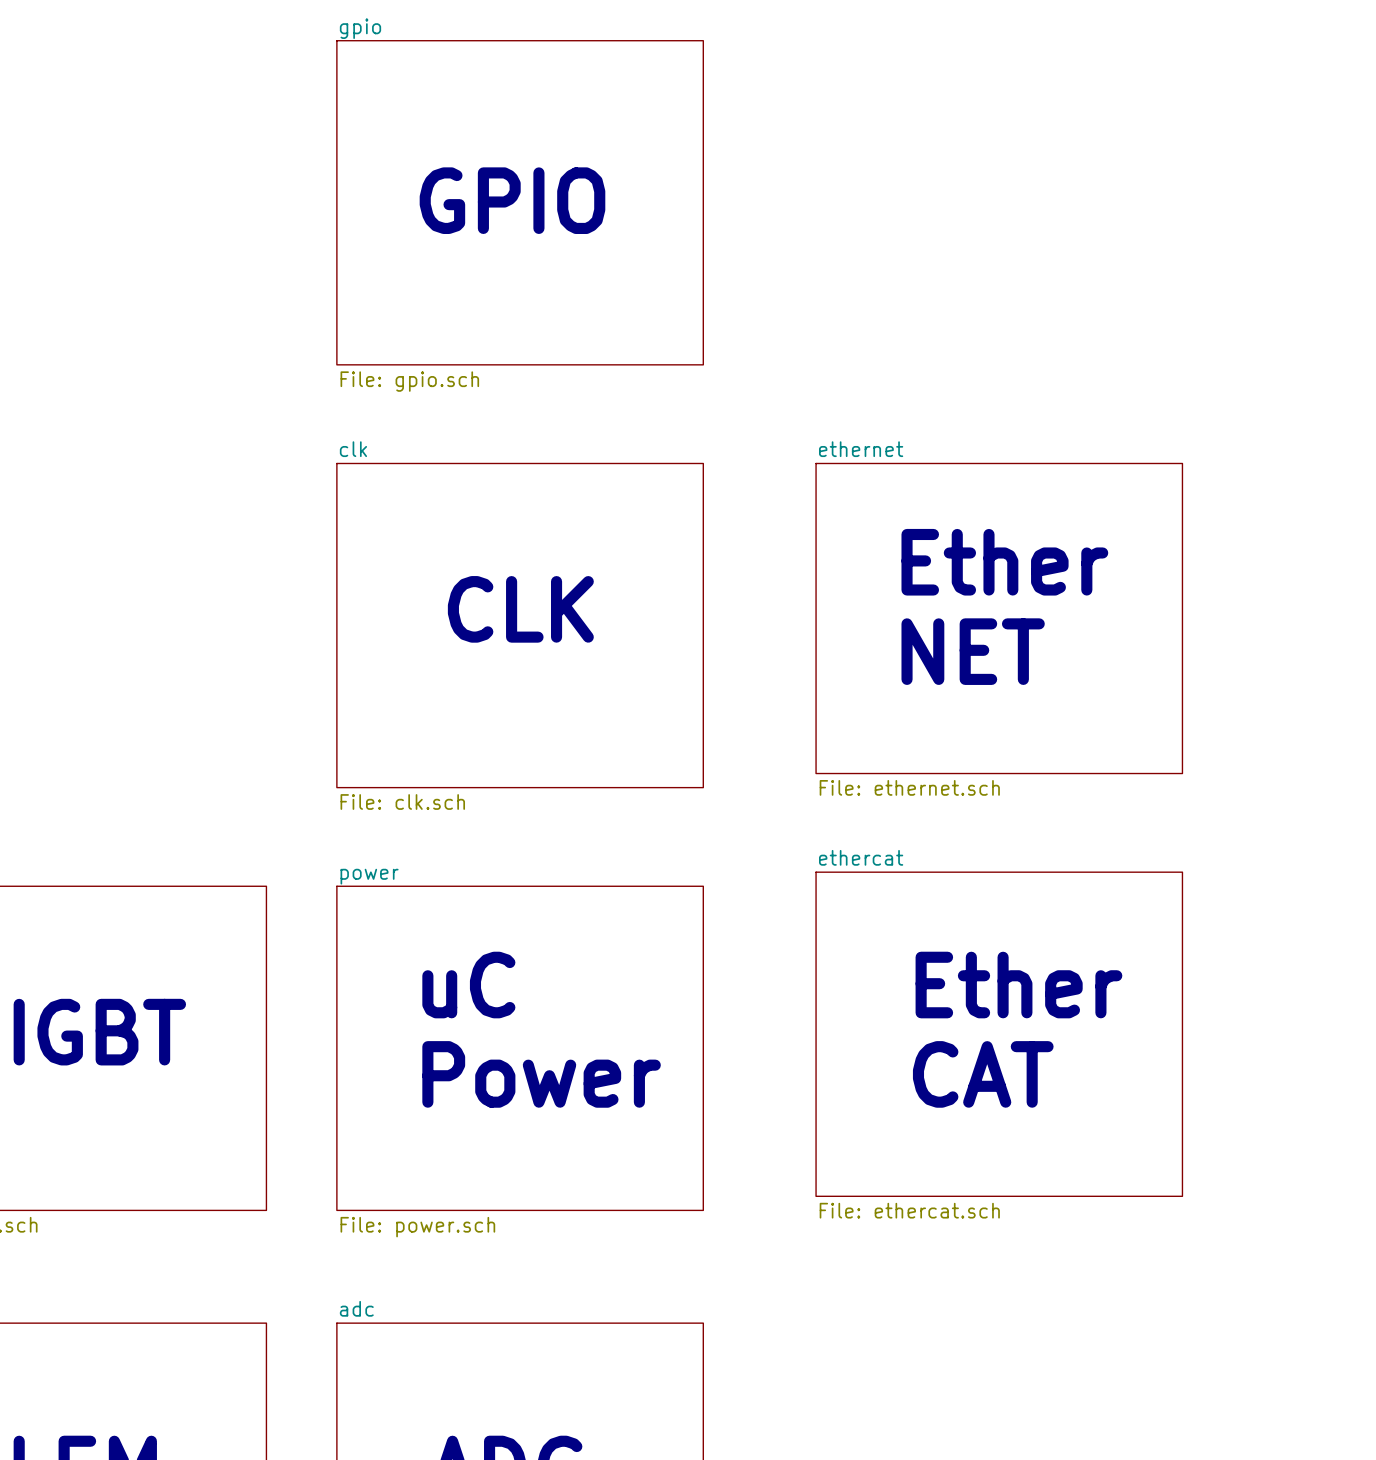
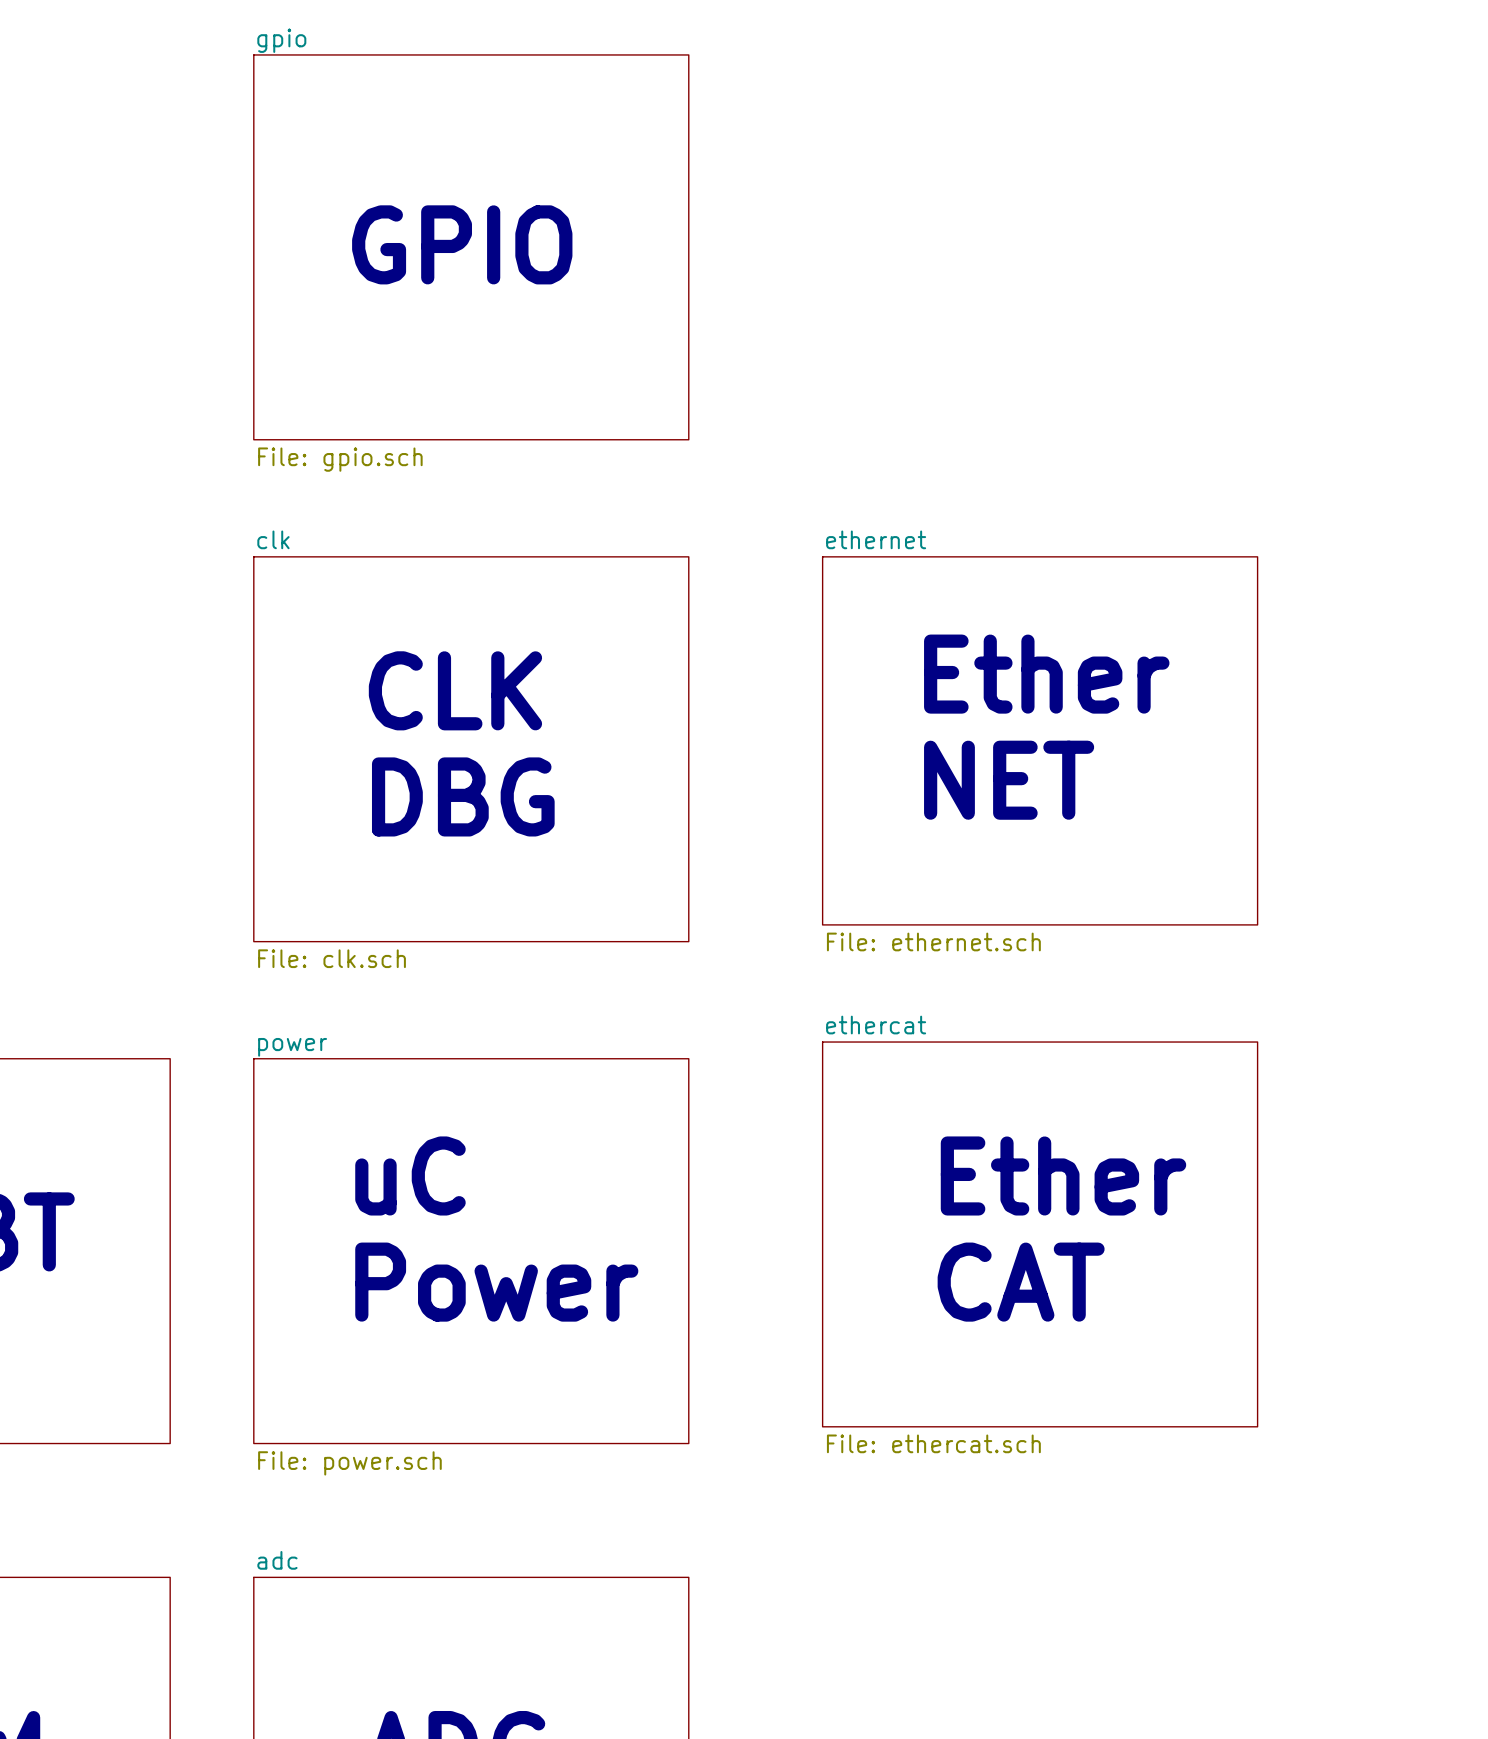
text position: CLK (520, 609) -> CLK (455, 690)
text: none -> DBG (463, 796)

